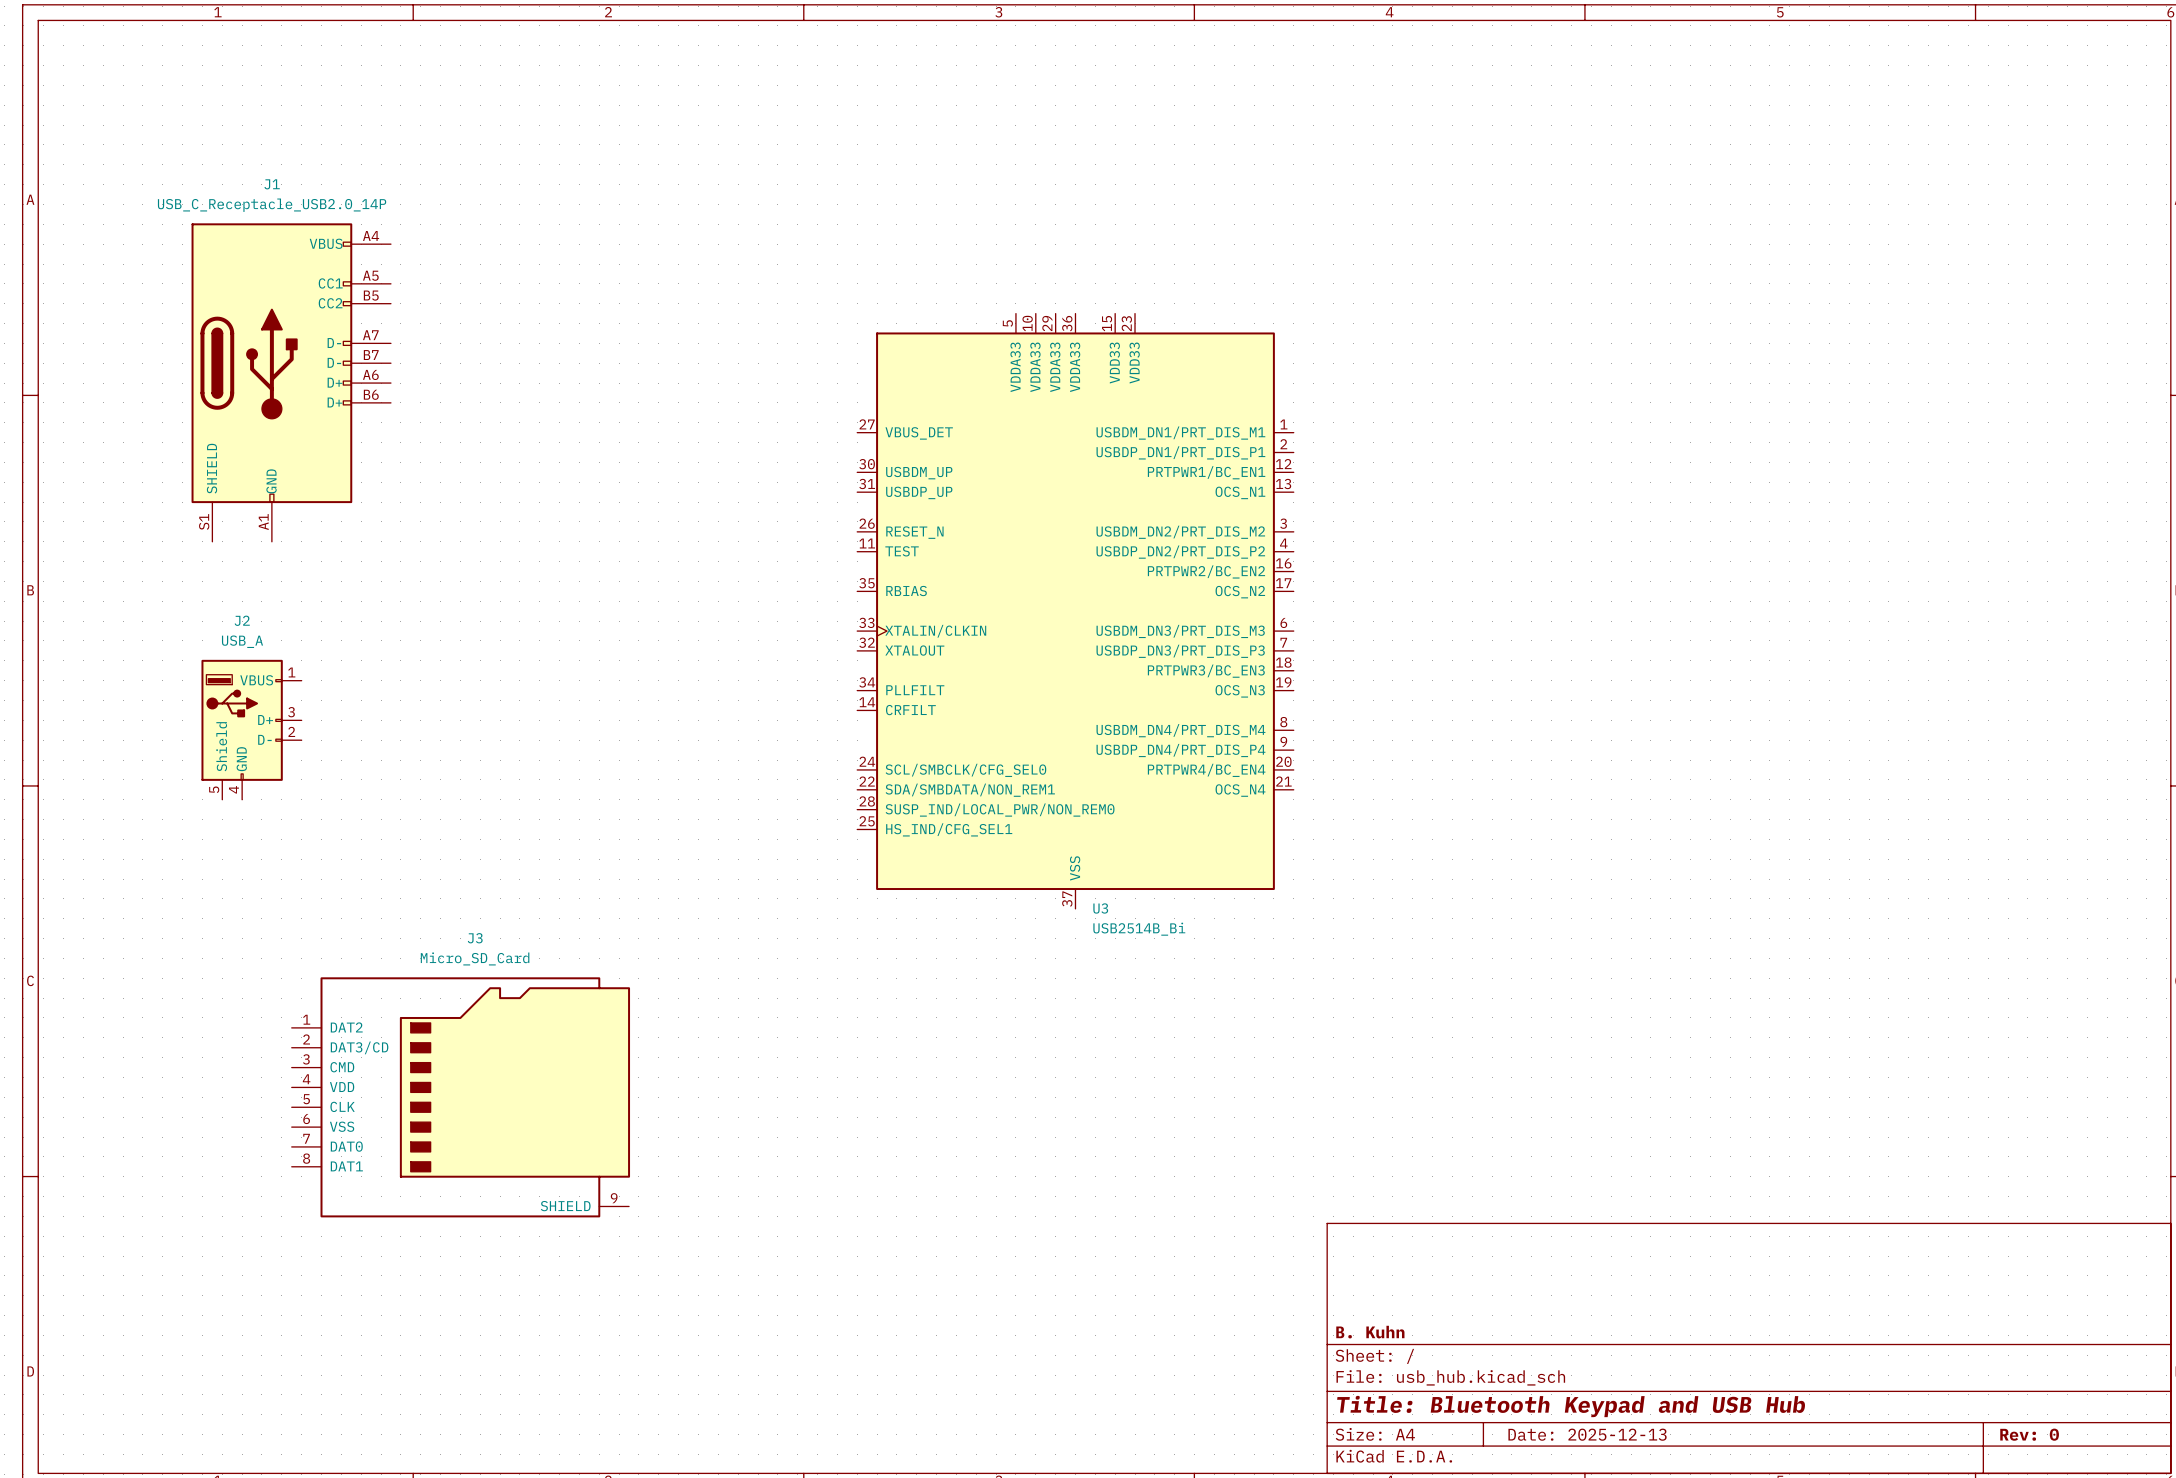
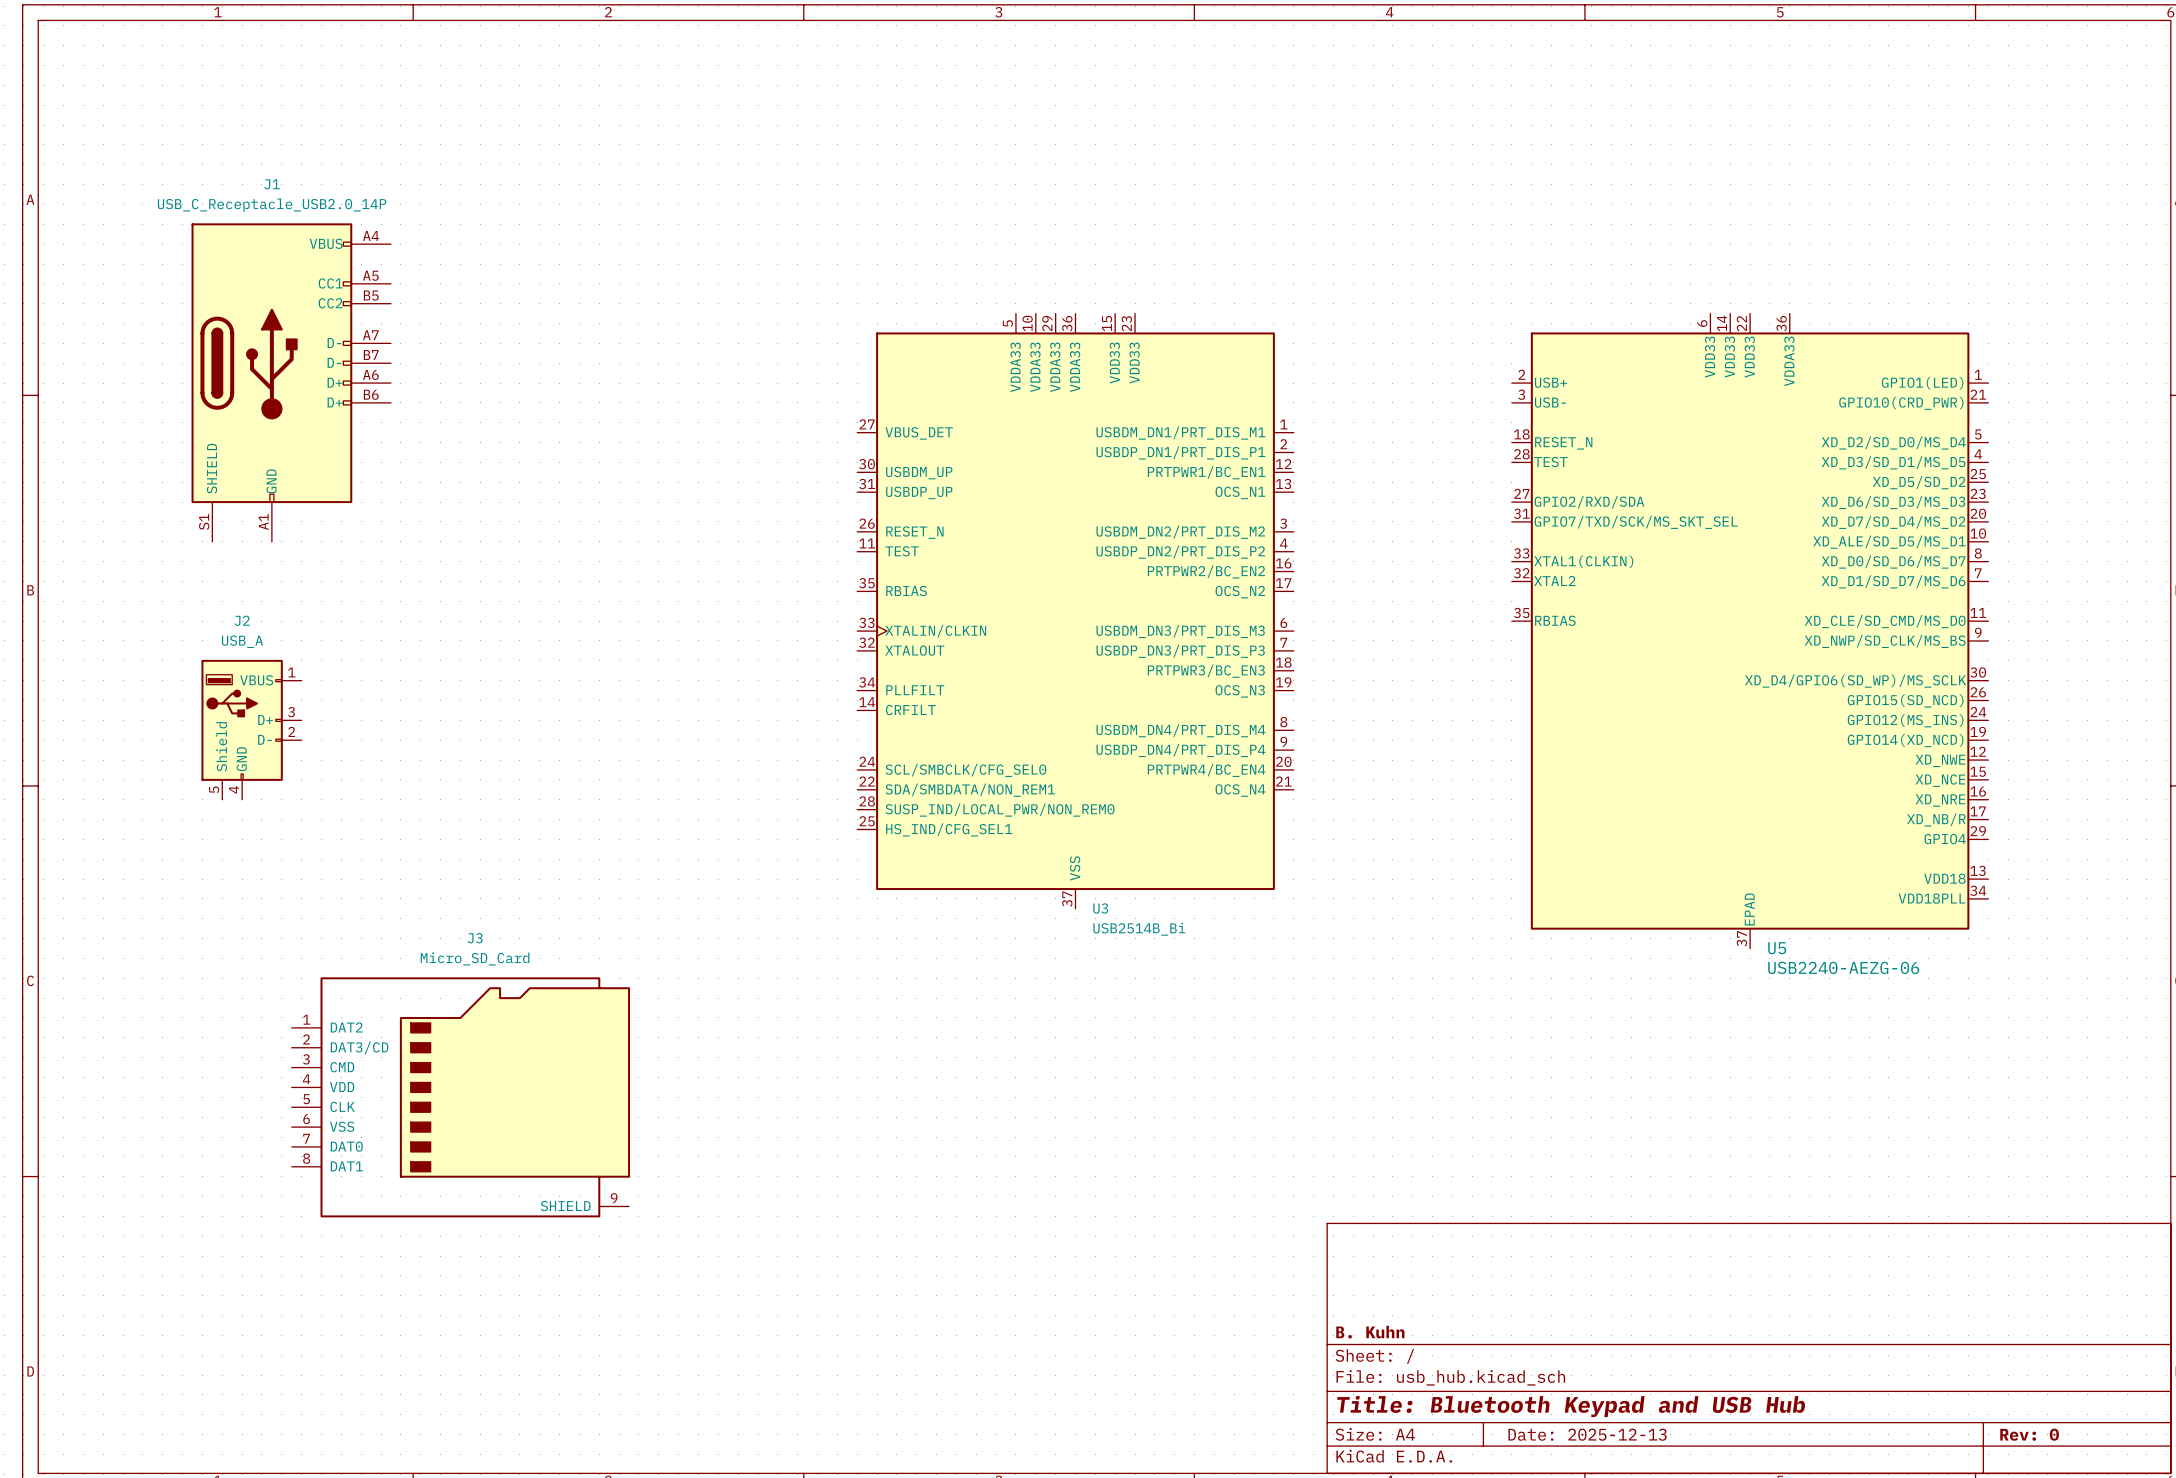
U5: none -> USB2240-AEZG-06 (1750, 631)

